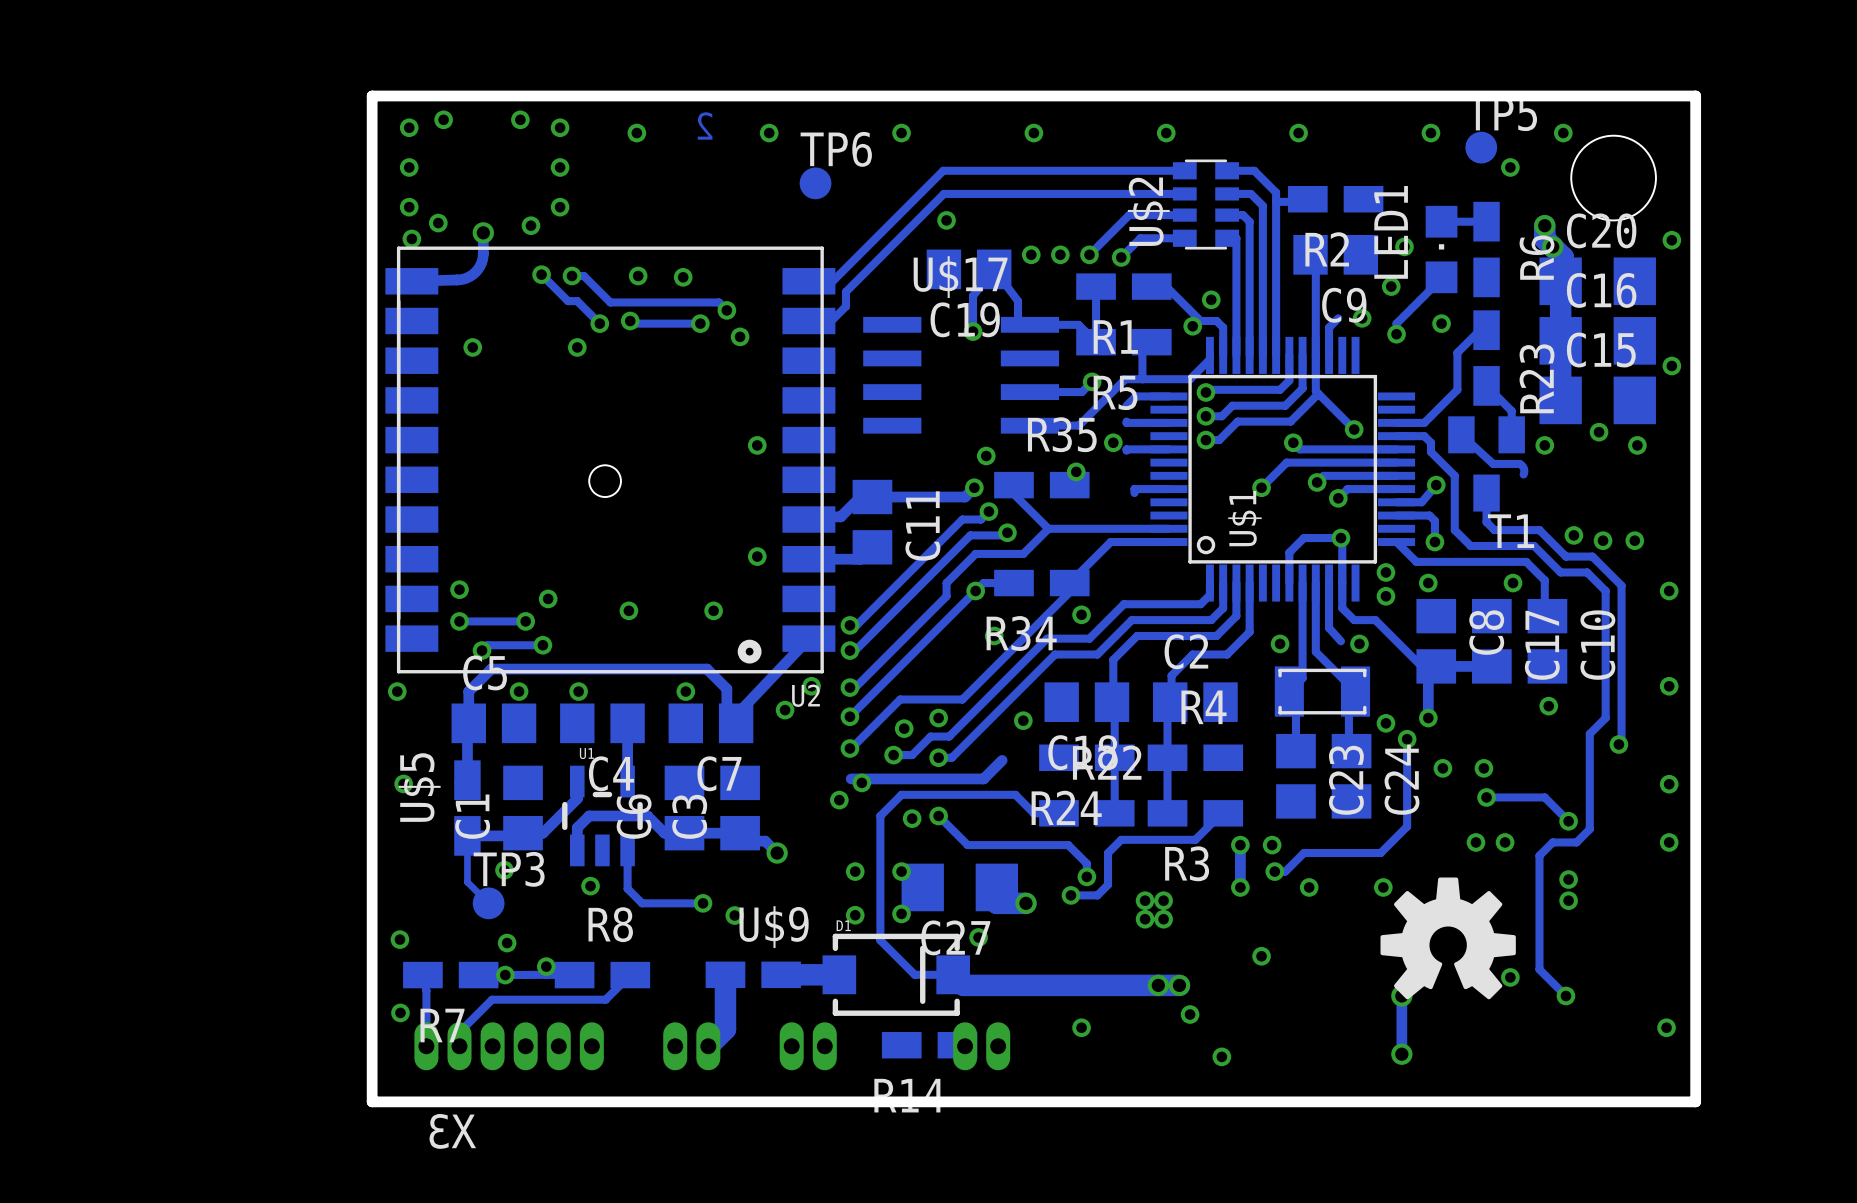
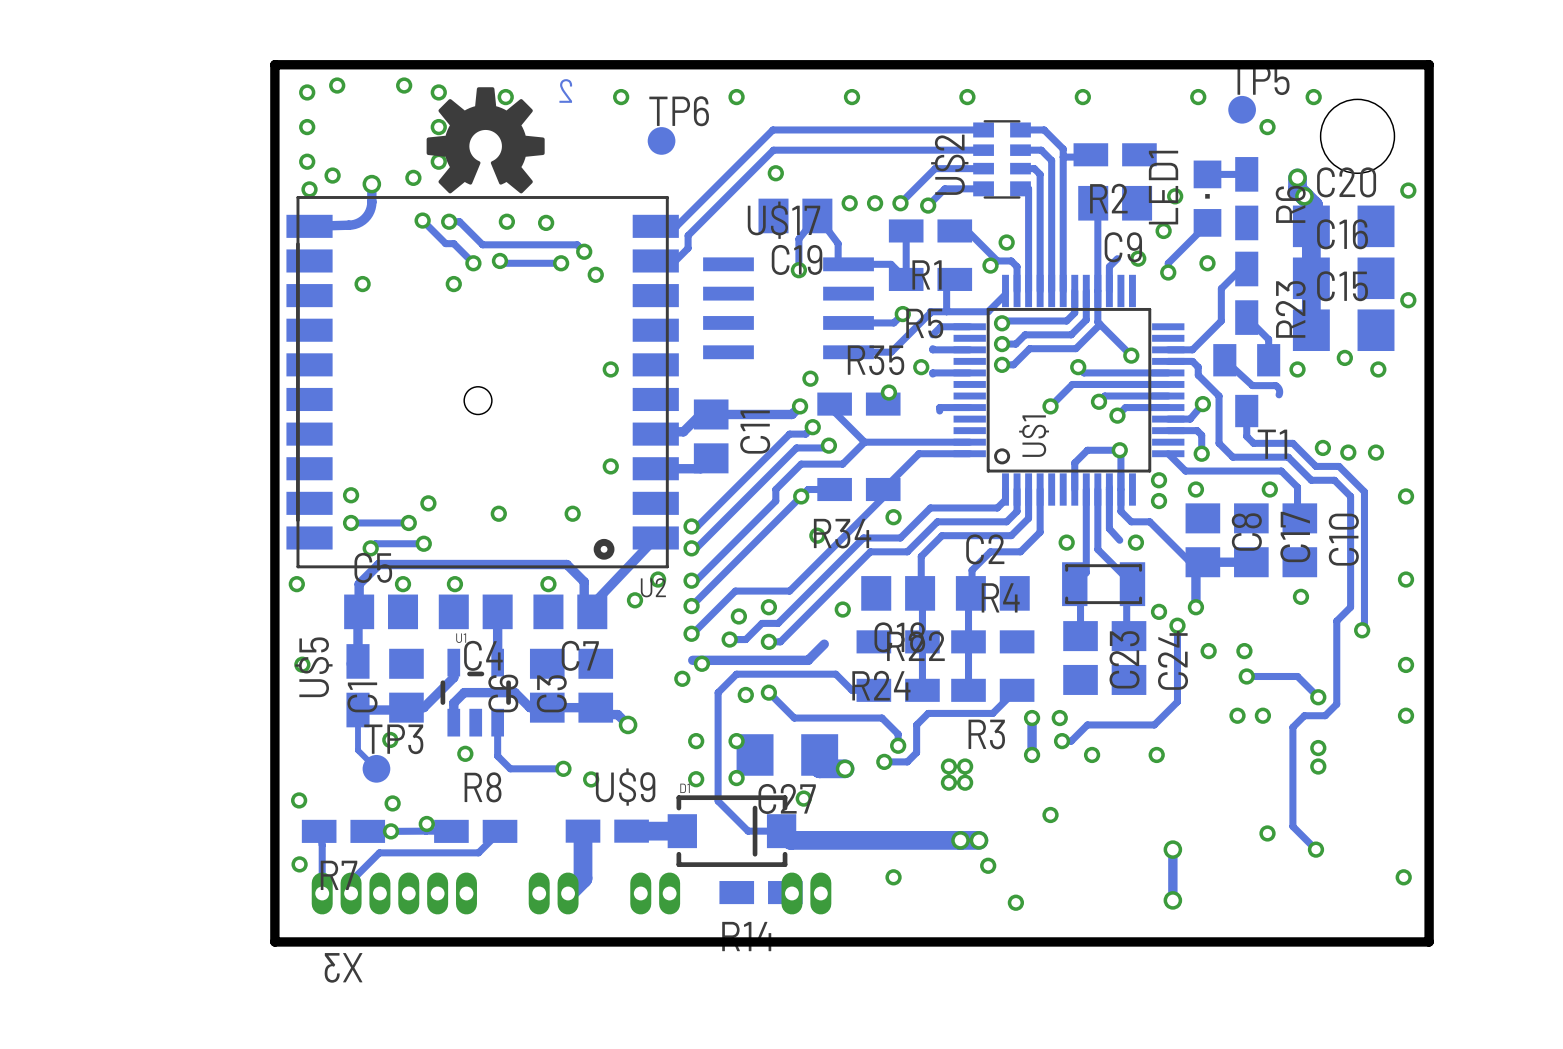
drawing: none -> [426, 87, 545, 194]
drawing: [1380, 877, 1516, 1000] -> none

